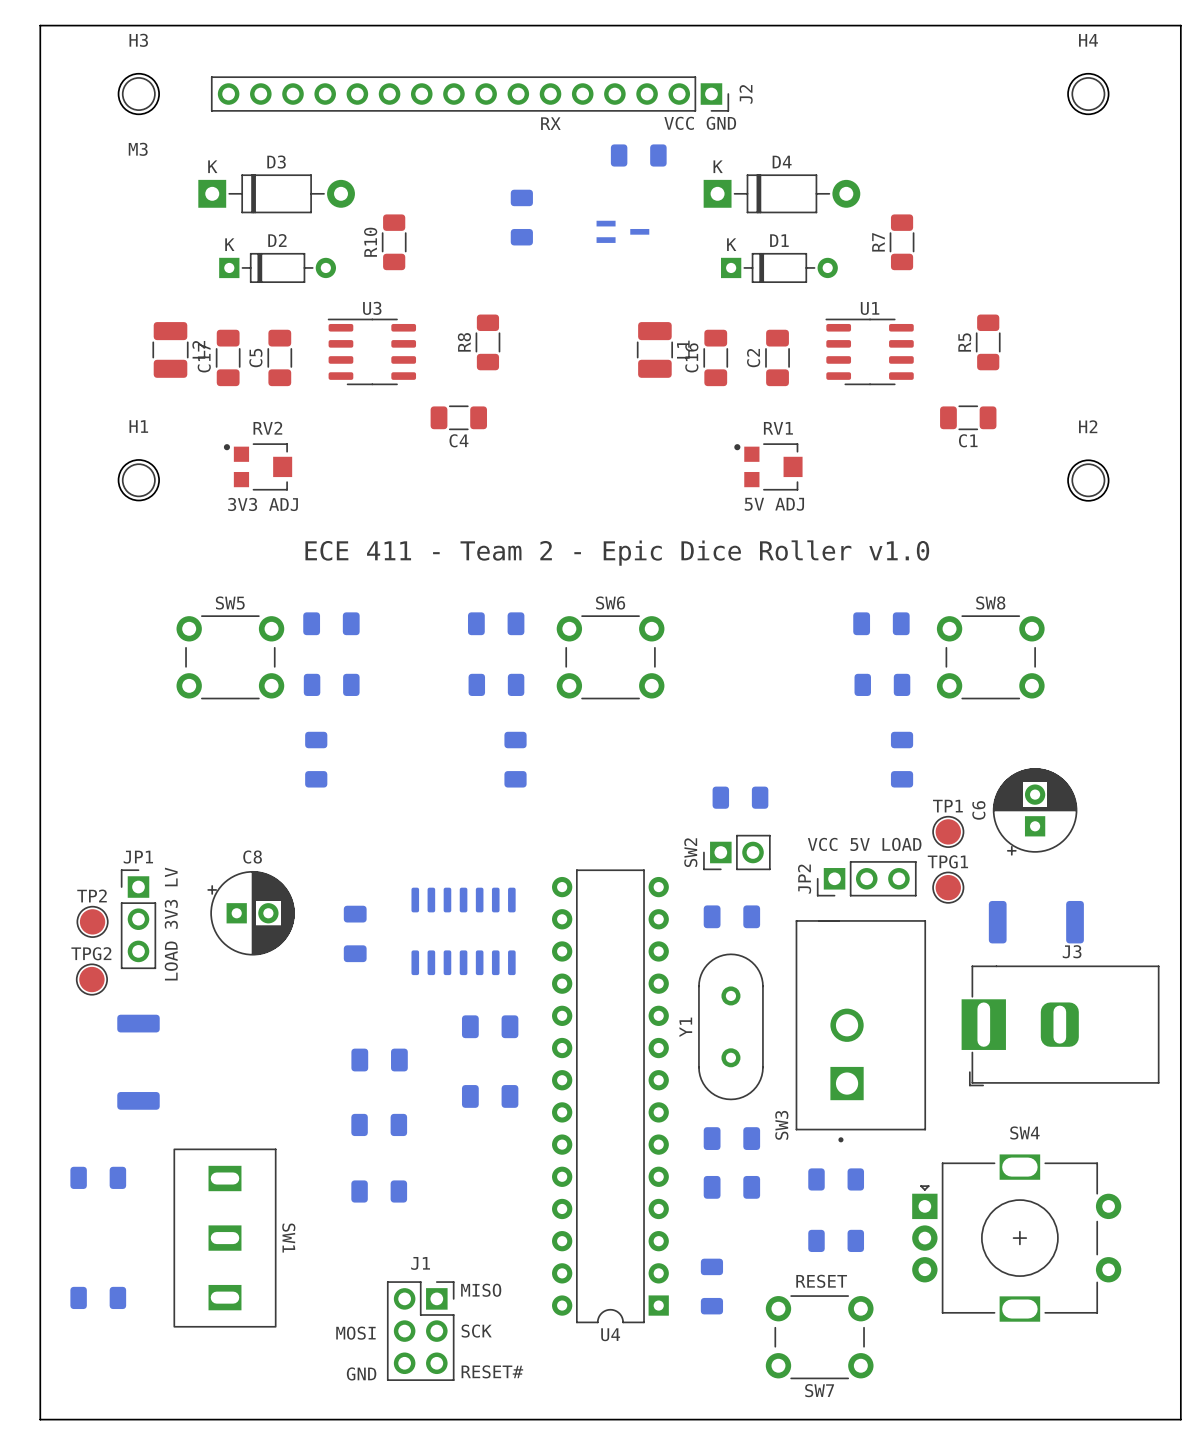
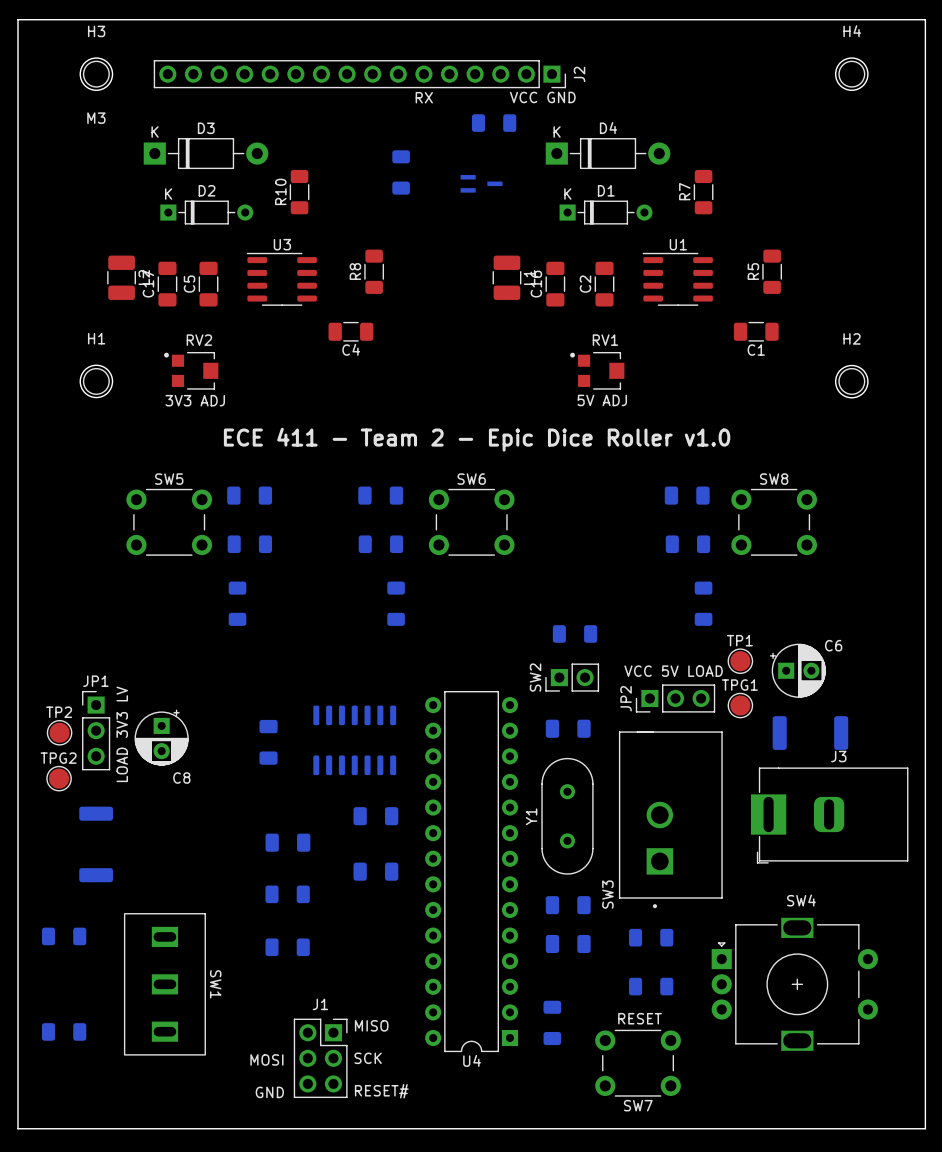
C6 footprint: [992, 768, 1078, 856] -> [769, 643, 826, 698]
C6 name position: C6 (978, 810) -> C6 (833, 645)
C8 name position: C8 (252, 857) -> C8 (181, 778)
C8 footprint: [207, 871, 295, 956] -> [134, 709, 189, 766]

